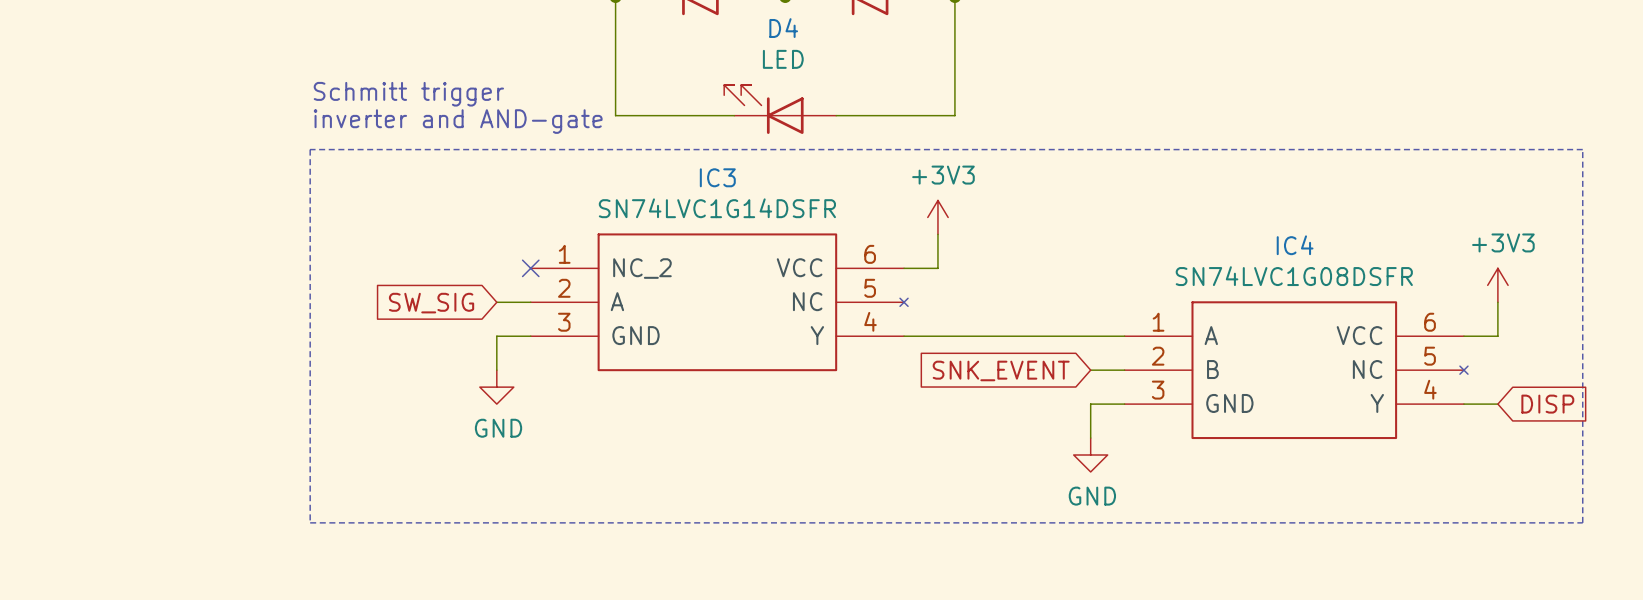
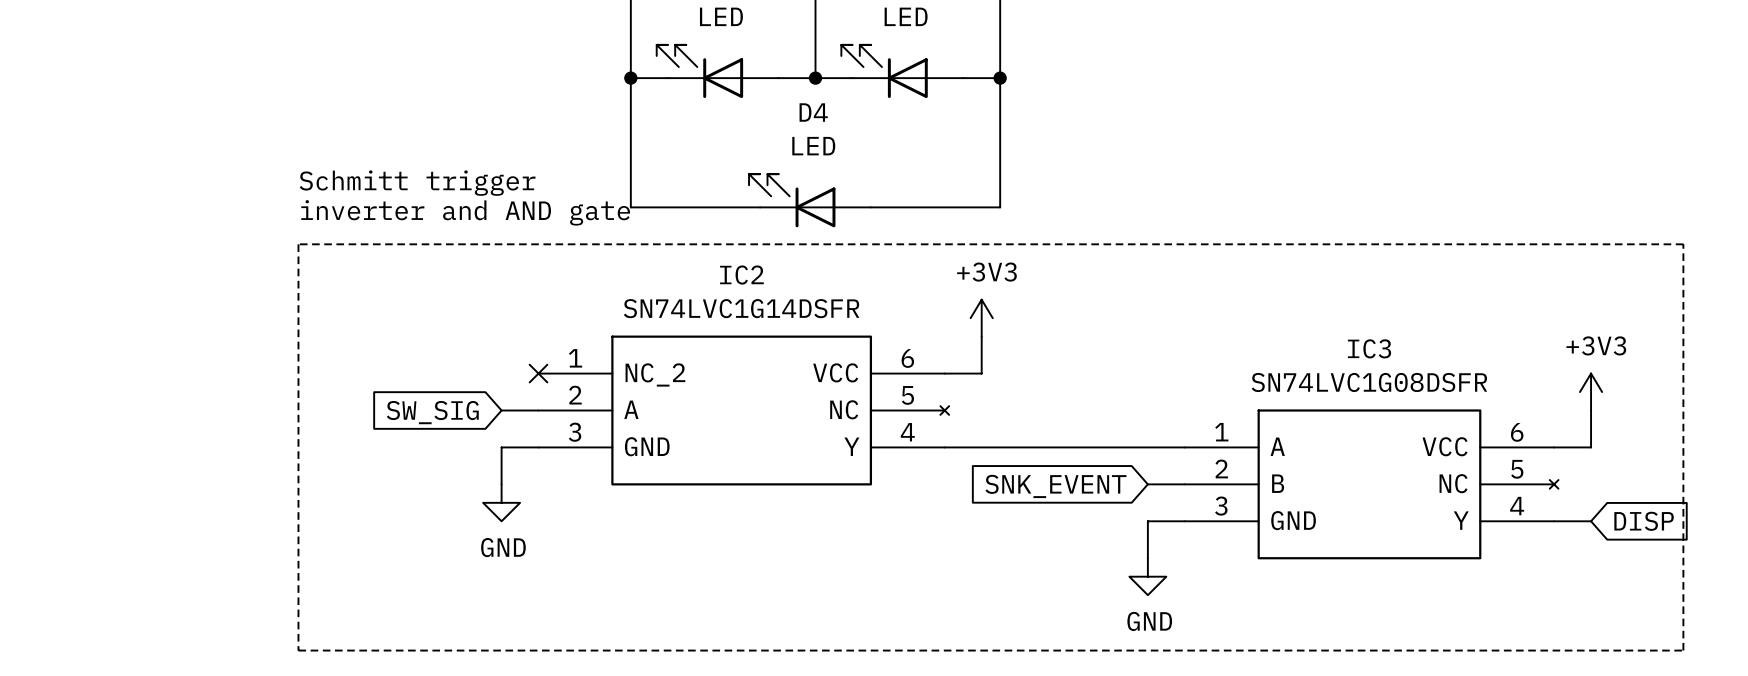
text: inverter and AND-gate (458, 121) -> inverter and AND gate (465, 212)
IC3 name: IC3 (717, 177) -> IC2 (741, 275)
IC4 name: IC4 (1295, 245) -> IC3 (1369, 348)

